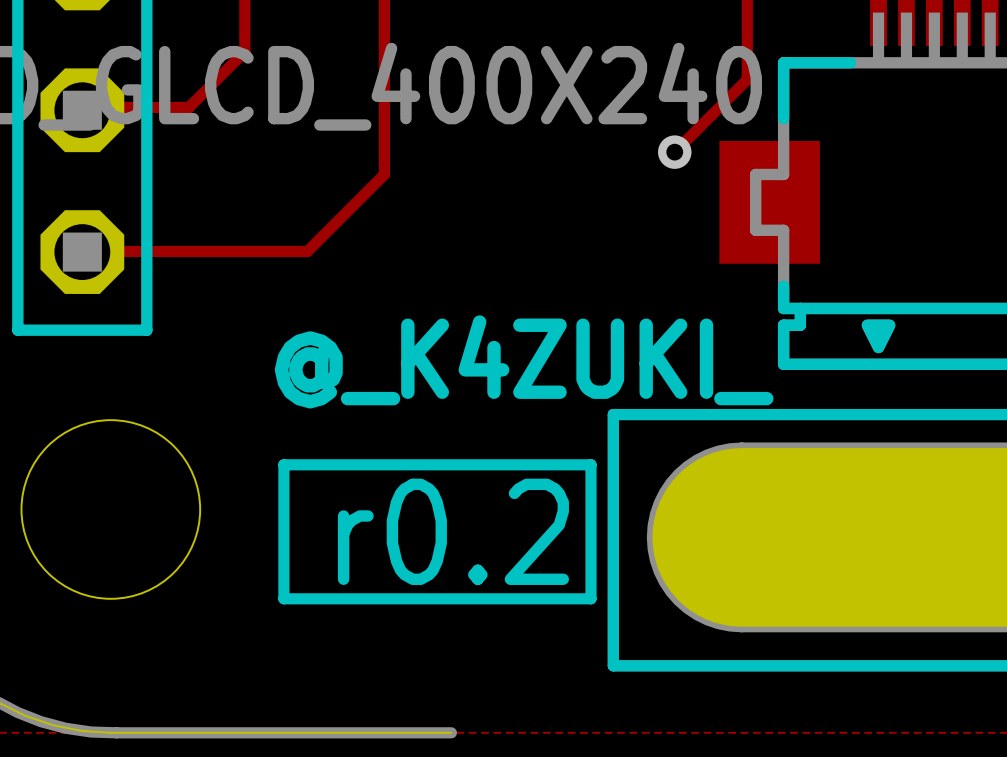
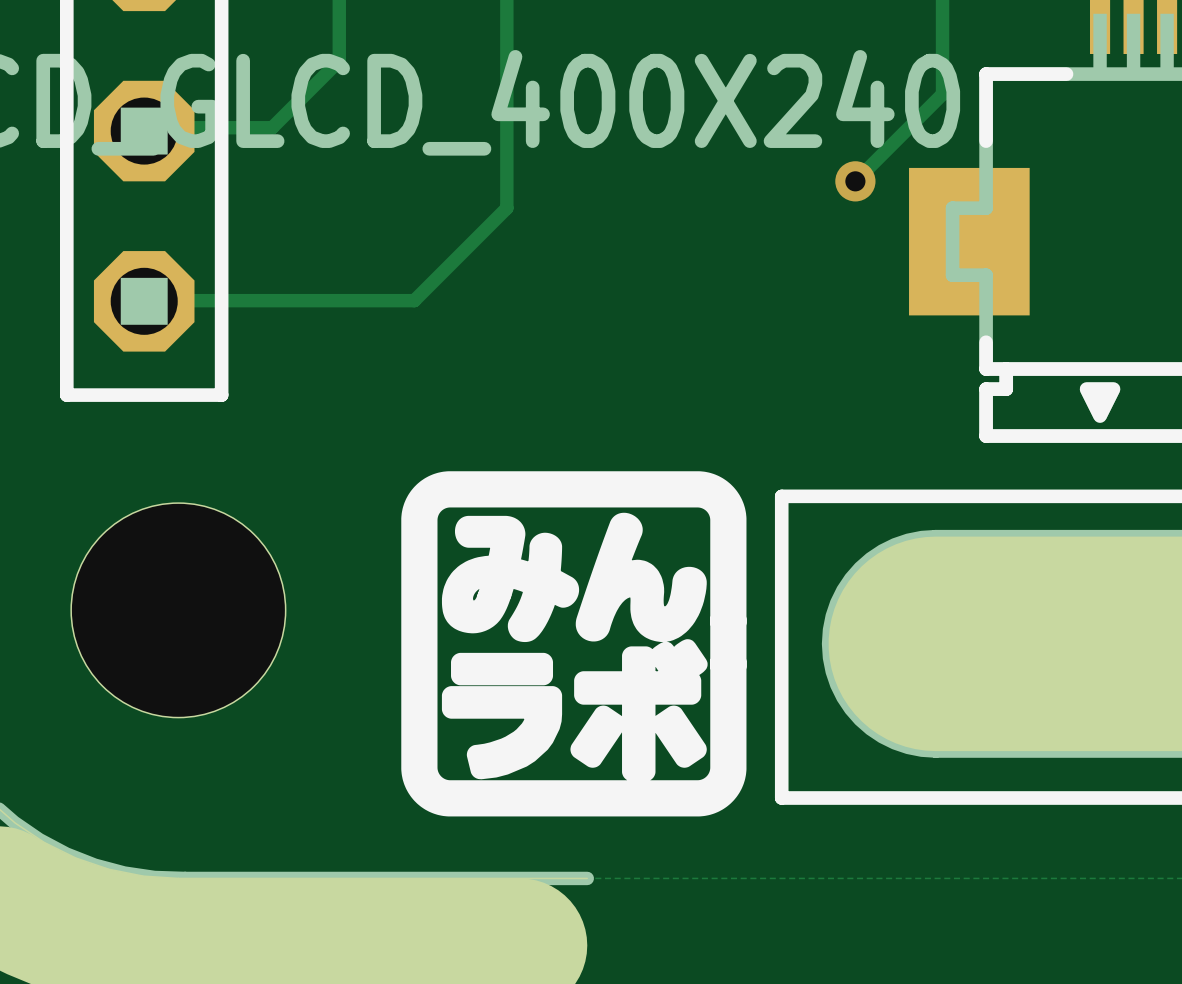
text: @_K4ZUKI_ (524, 361) -> none
drawing shape: [278, 459, 597, 605] -> [401, 471, 747, 817]

